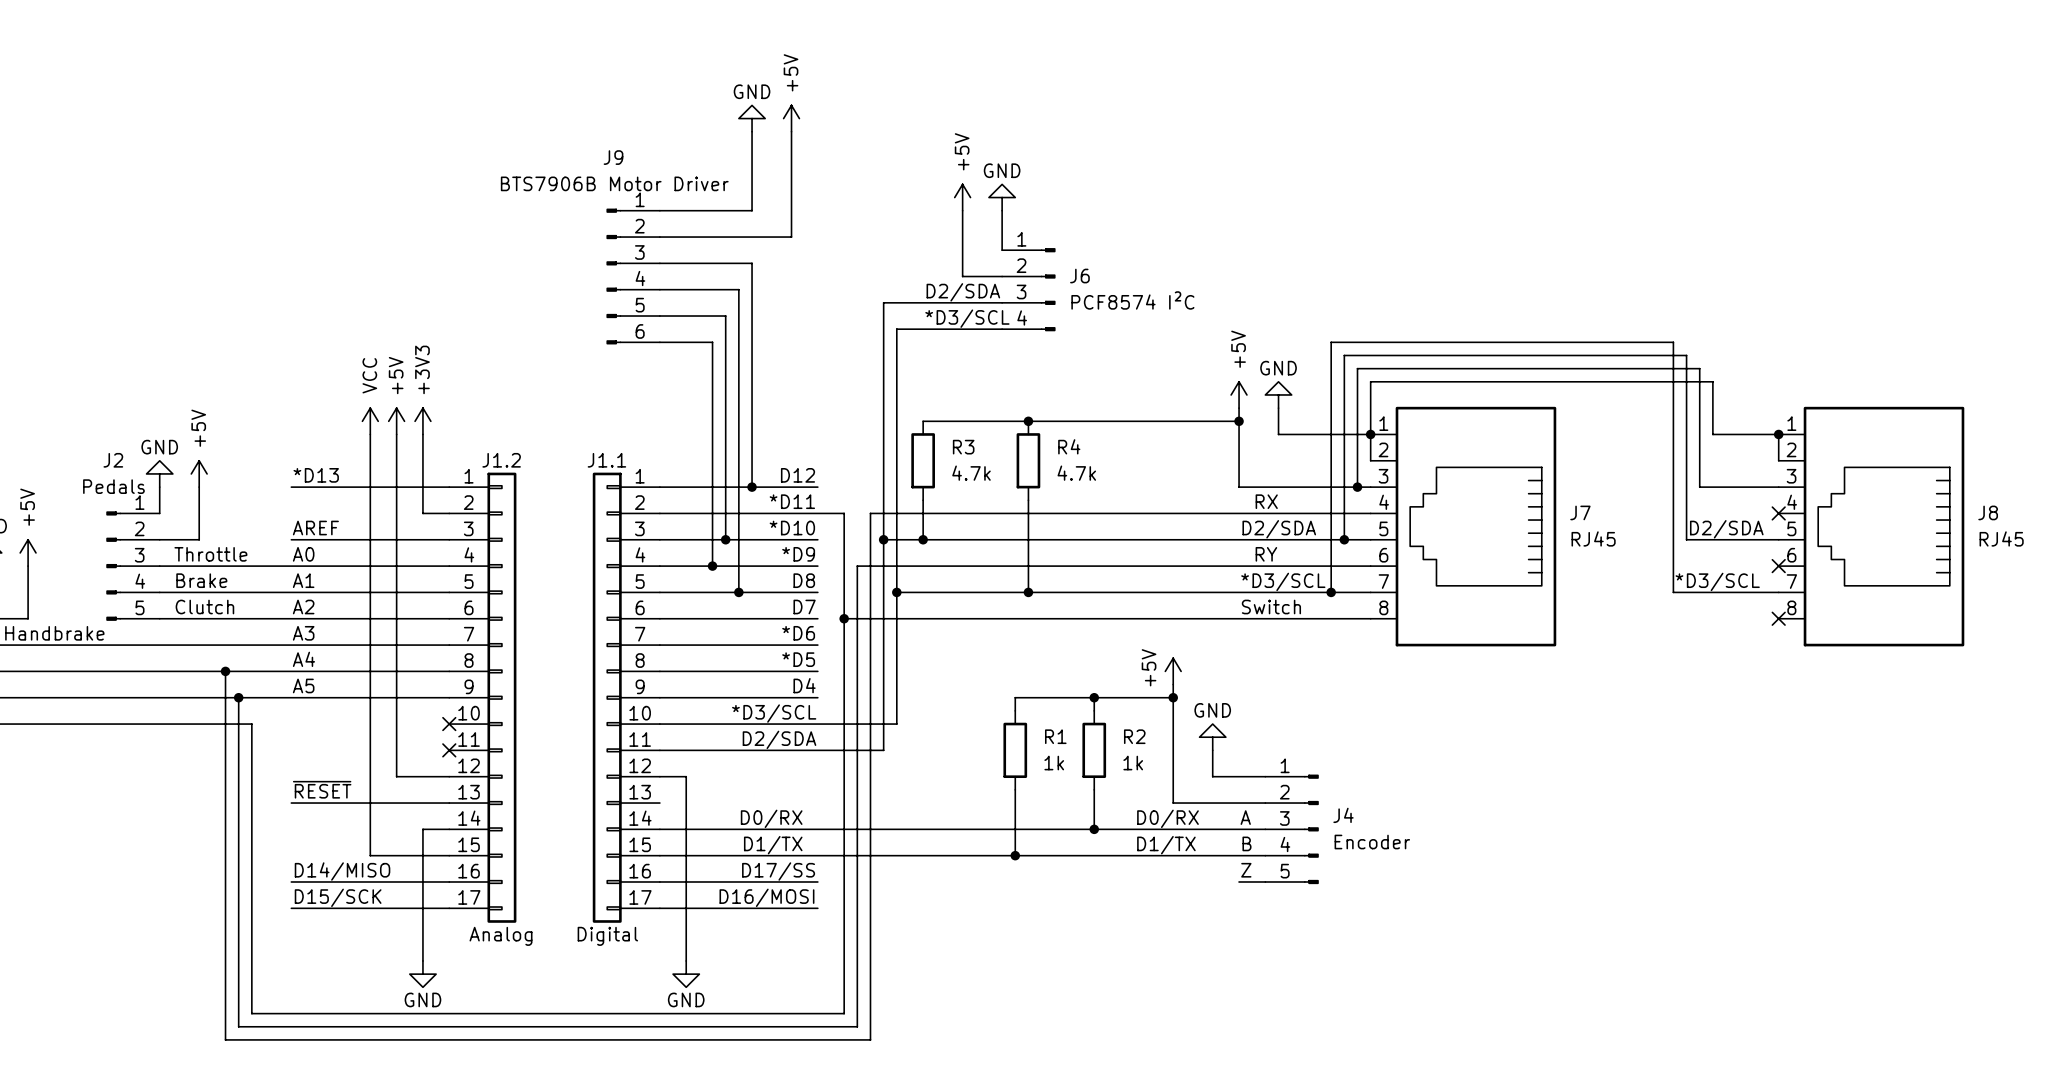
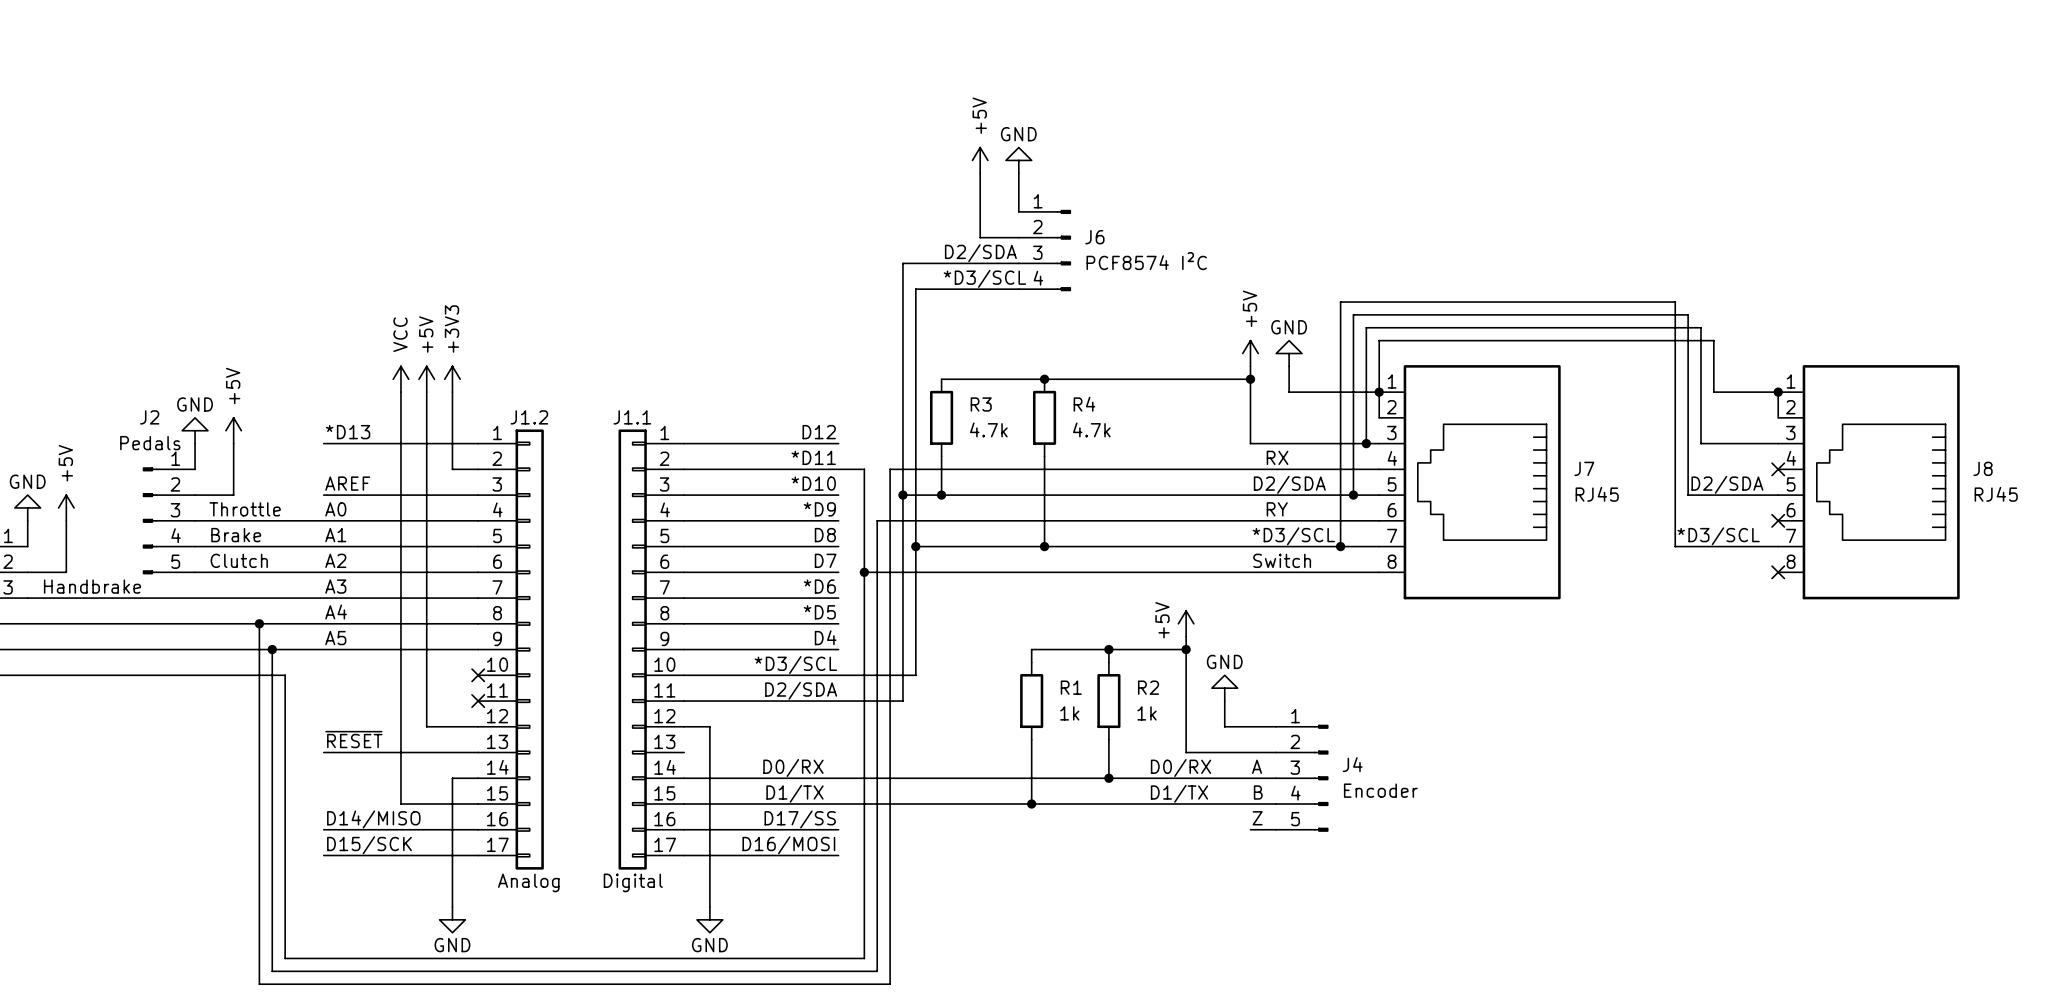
power symbol: GND (752, 118) -> none
power symbol: +5V (791, 118) -> none
wire: (752, 131) (752, 210) (659, 210) -> none
wire: (791, 131) (791, 237) (659, 237) -> none
wire: (659, 263) (752, 263) (752, 487) -> none
J9: BTS7906B Motor Driver (633, 276) -> none
wire: (659, 289) (738, 289) (738, 592) -> none
wire: (659, 316) (725, 316) (725, 539) -> none
wire: (659, 342) (712, 342) (712, 566) -> none
junction: (752, 487) -> none
junction: (725, 539) -> none
junction: (712, 566) -> none
junction: (738, 592) -> none

